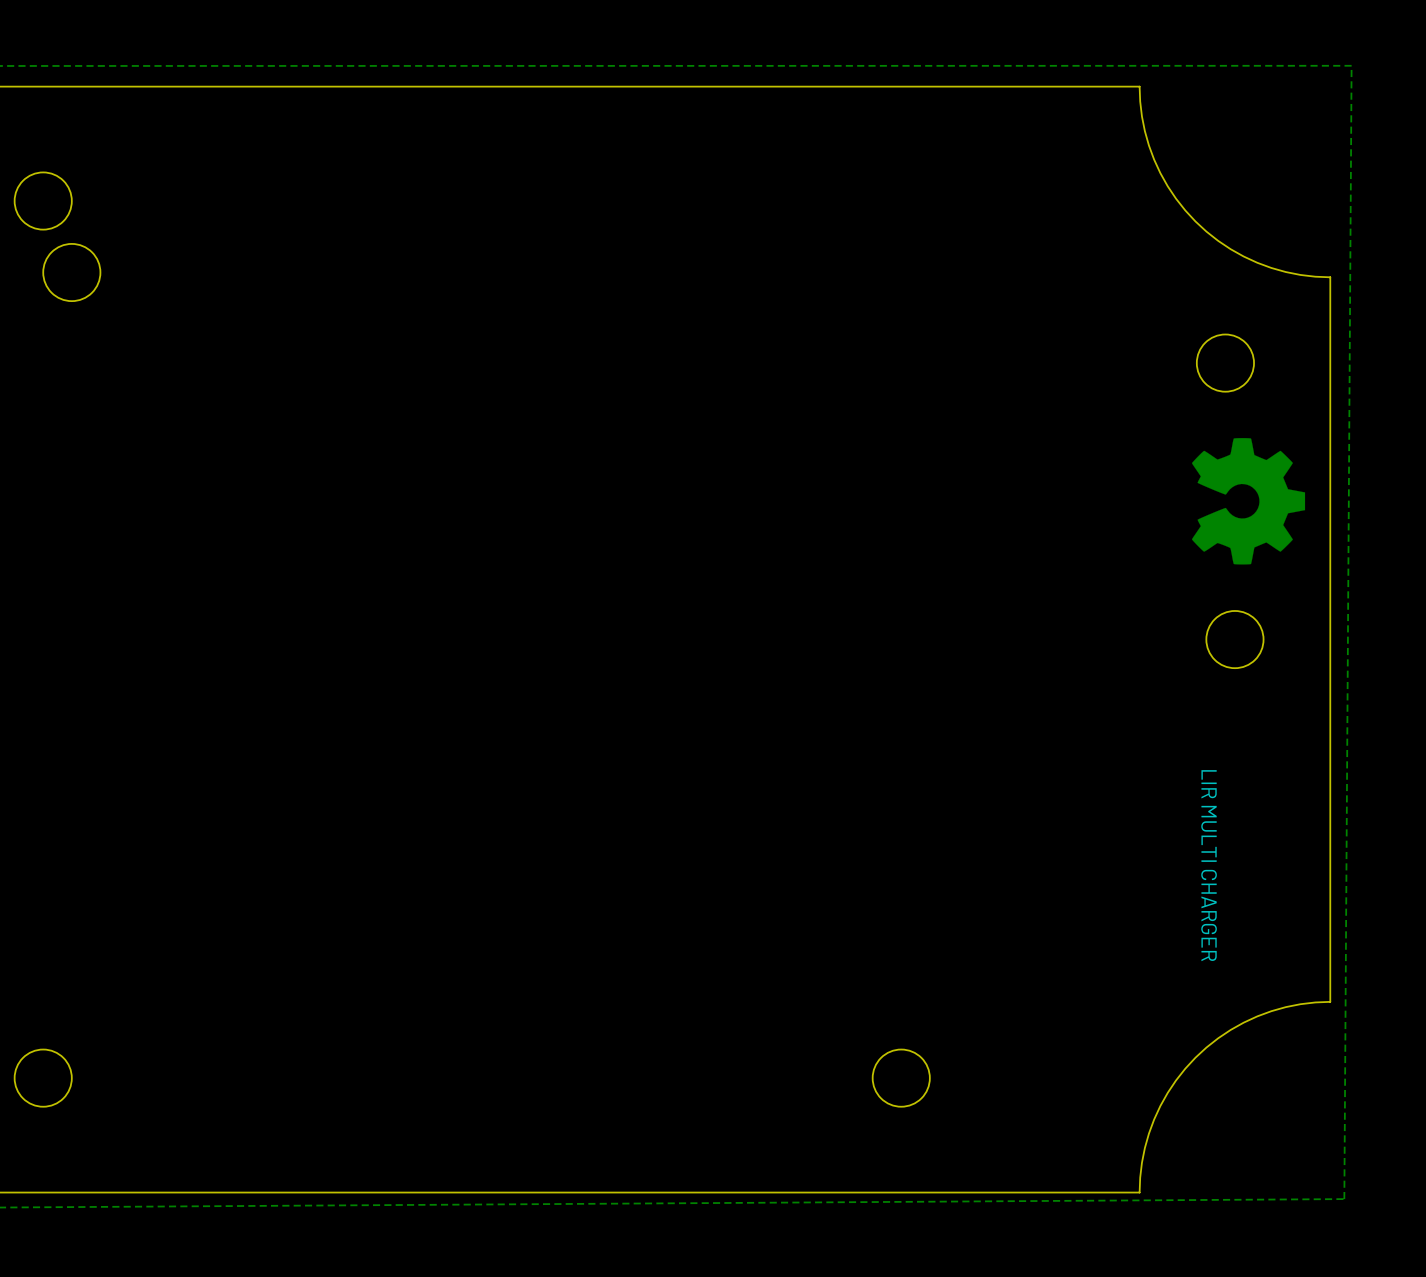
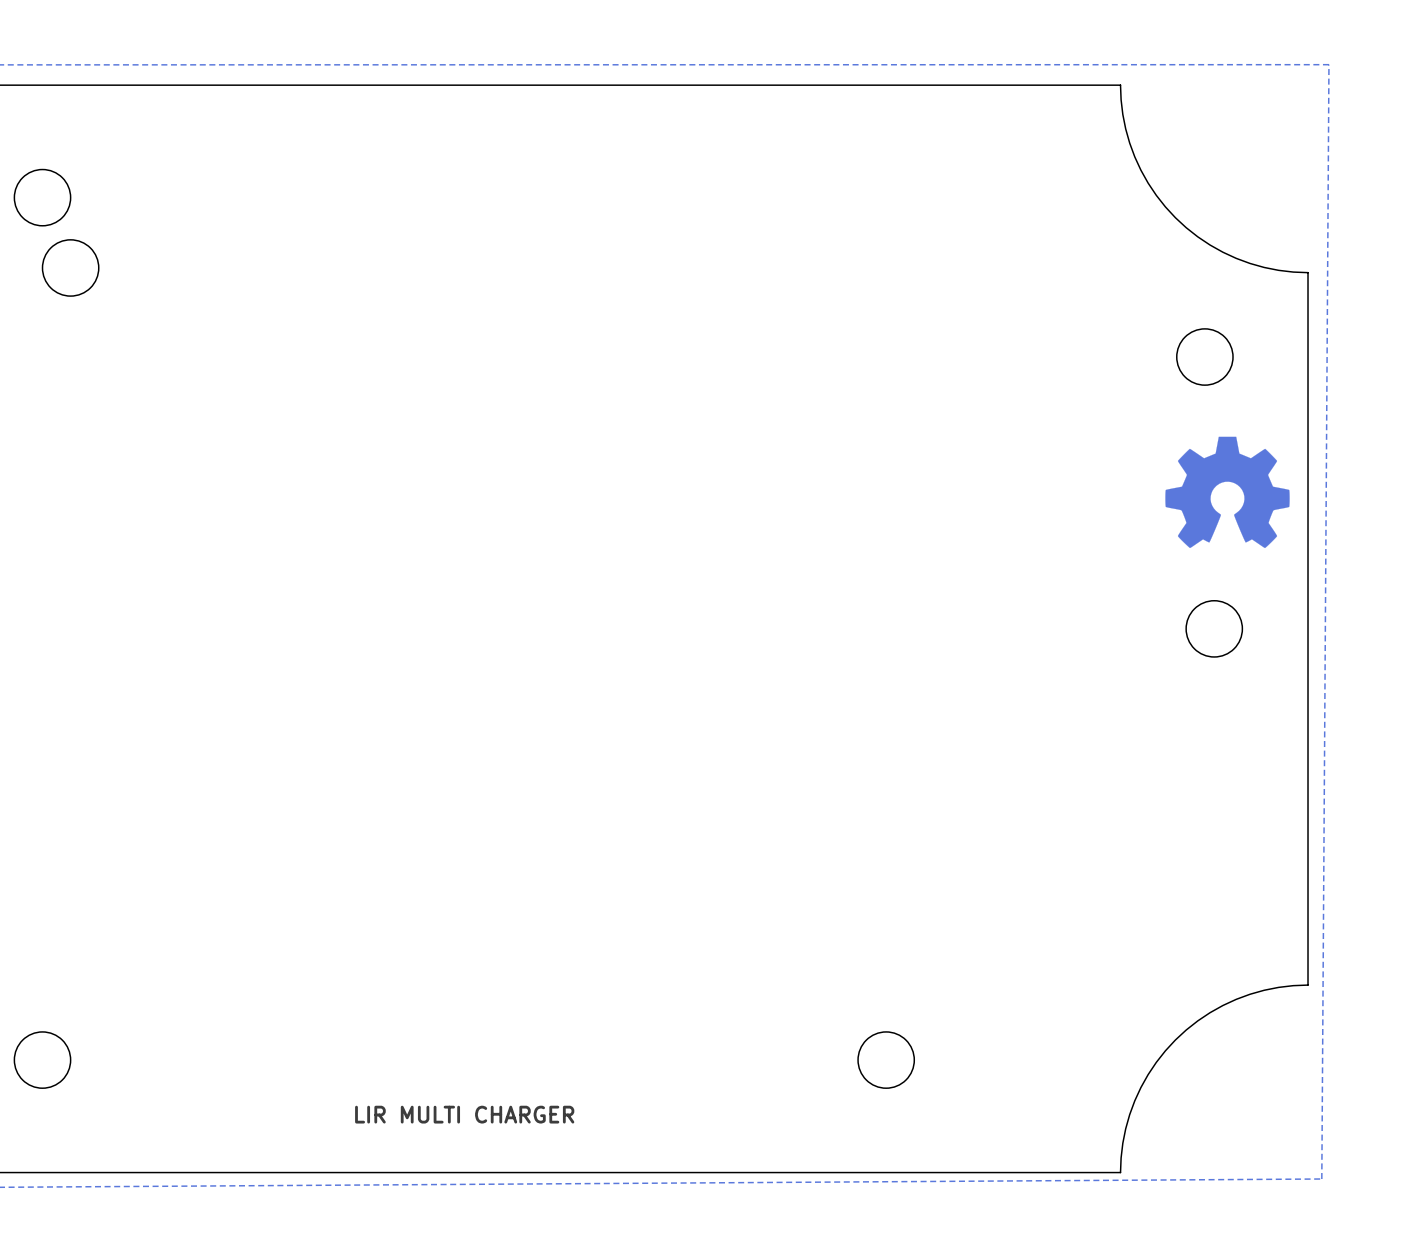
drawing shape: [1191, 438, 1306, 565] -> [1165, 436, 1290, 549]
text: LIR MULTI CHARGER (1209, 865) -> none
text: none -> LIR MULTI CHARGER (464, 1114)

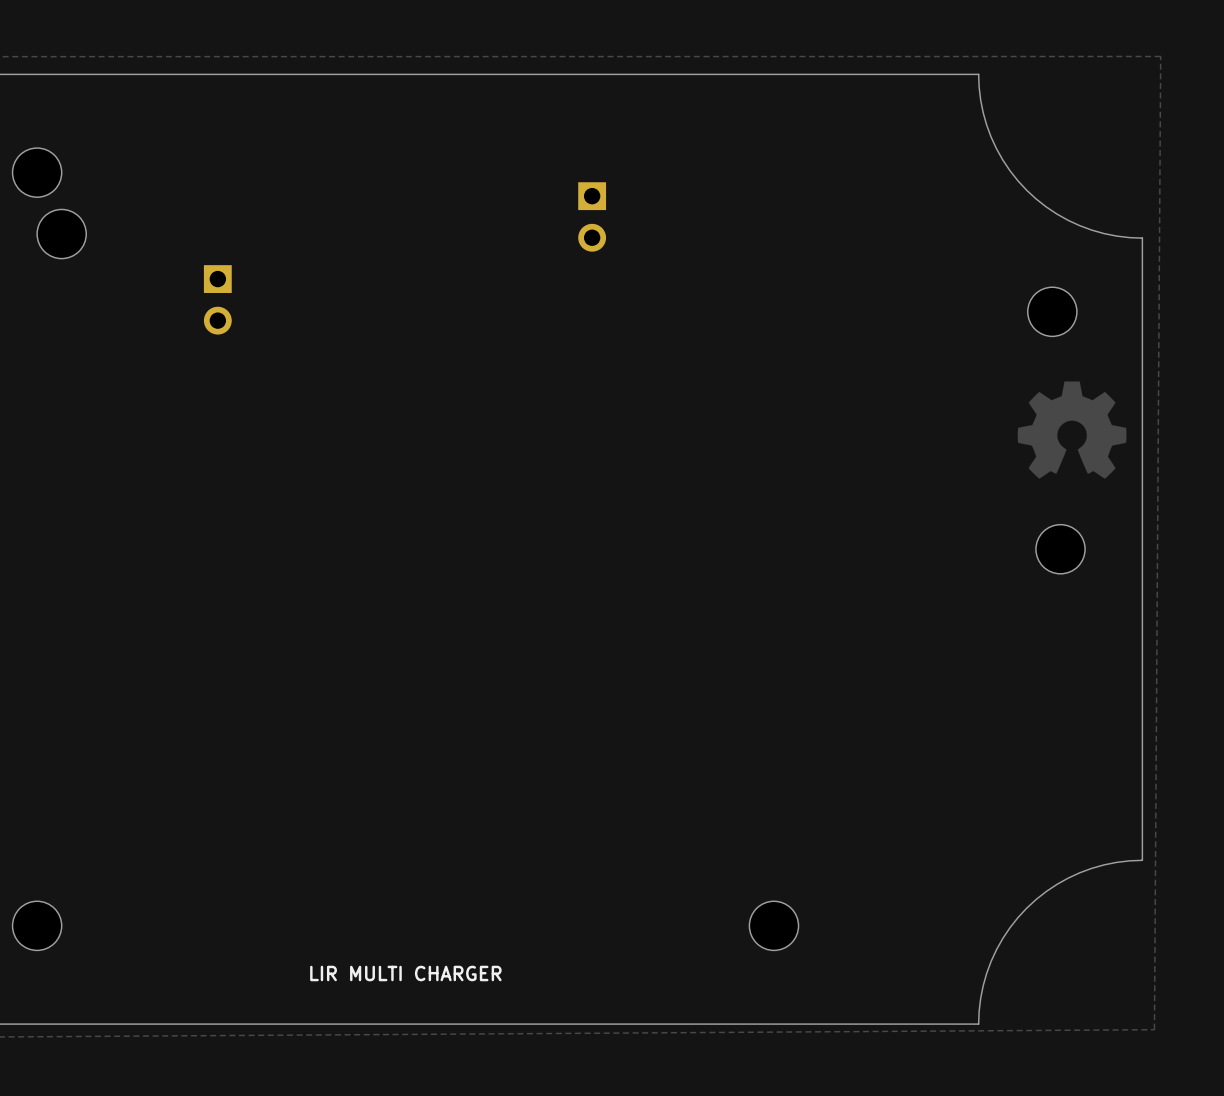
part: none -> (592, 216)
part: none -> (217, 299)

